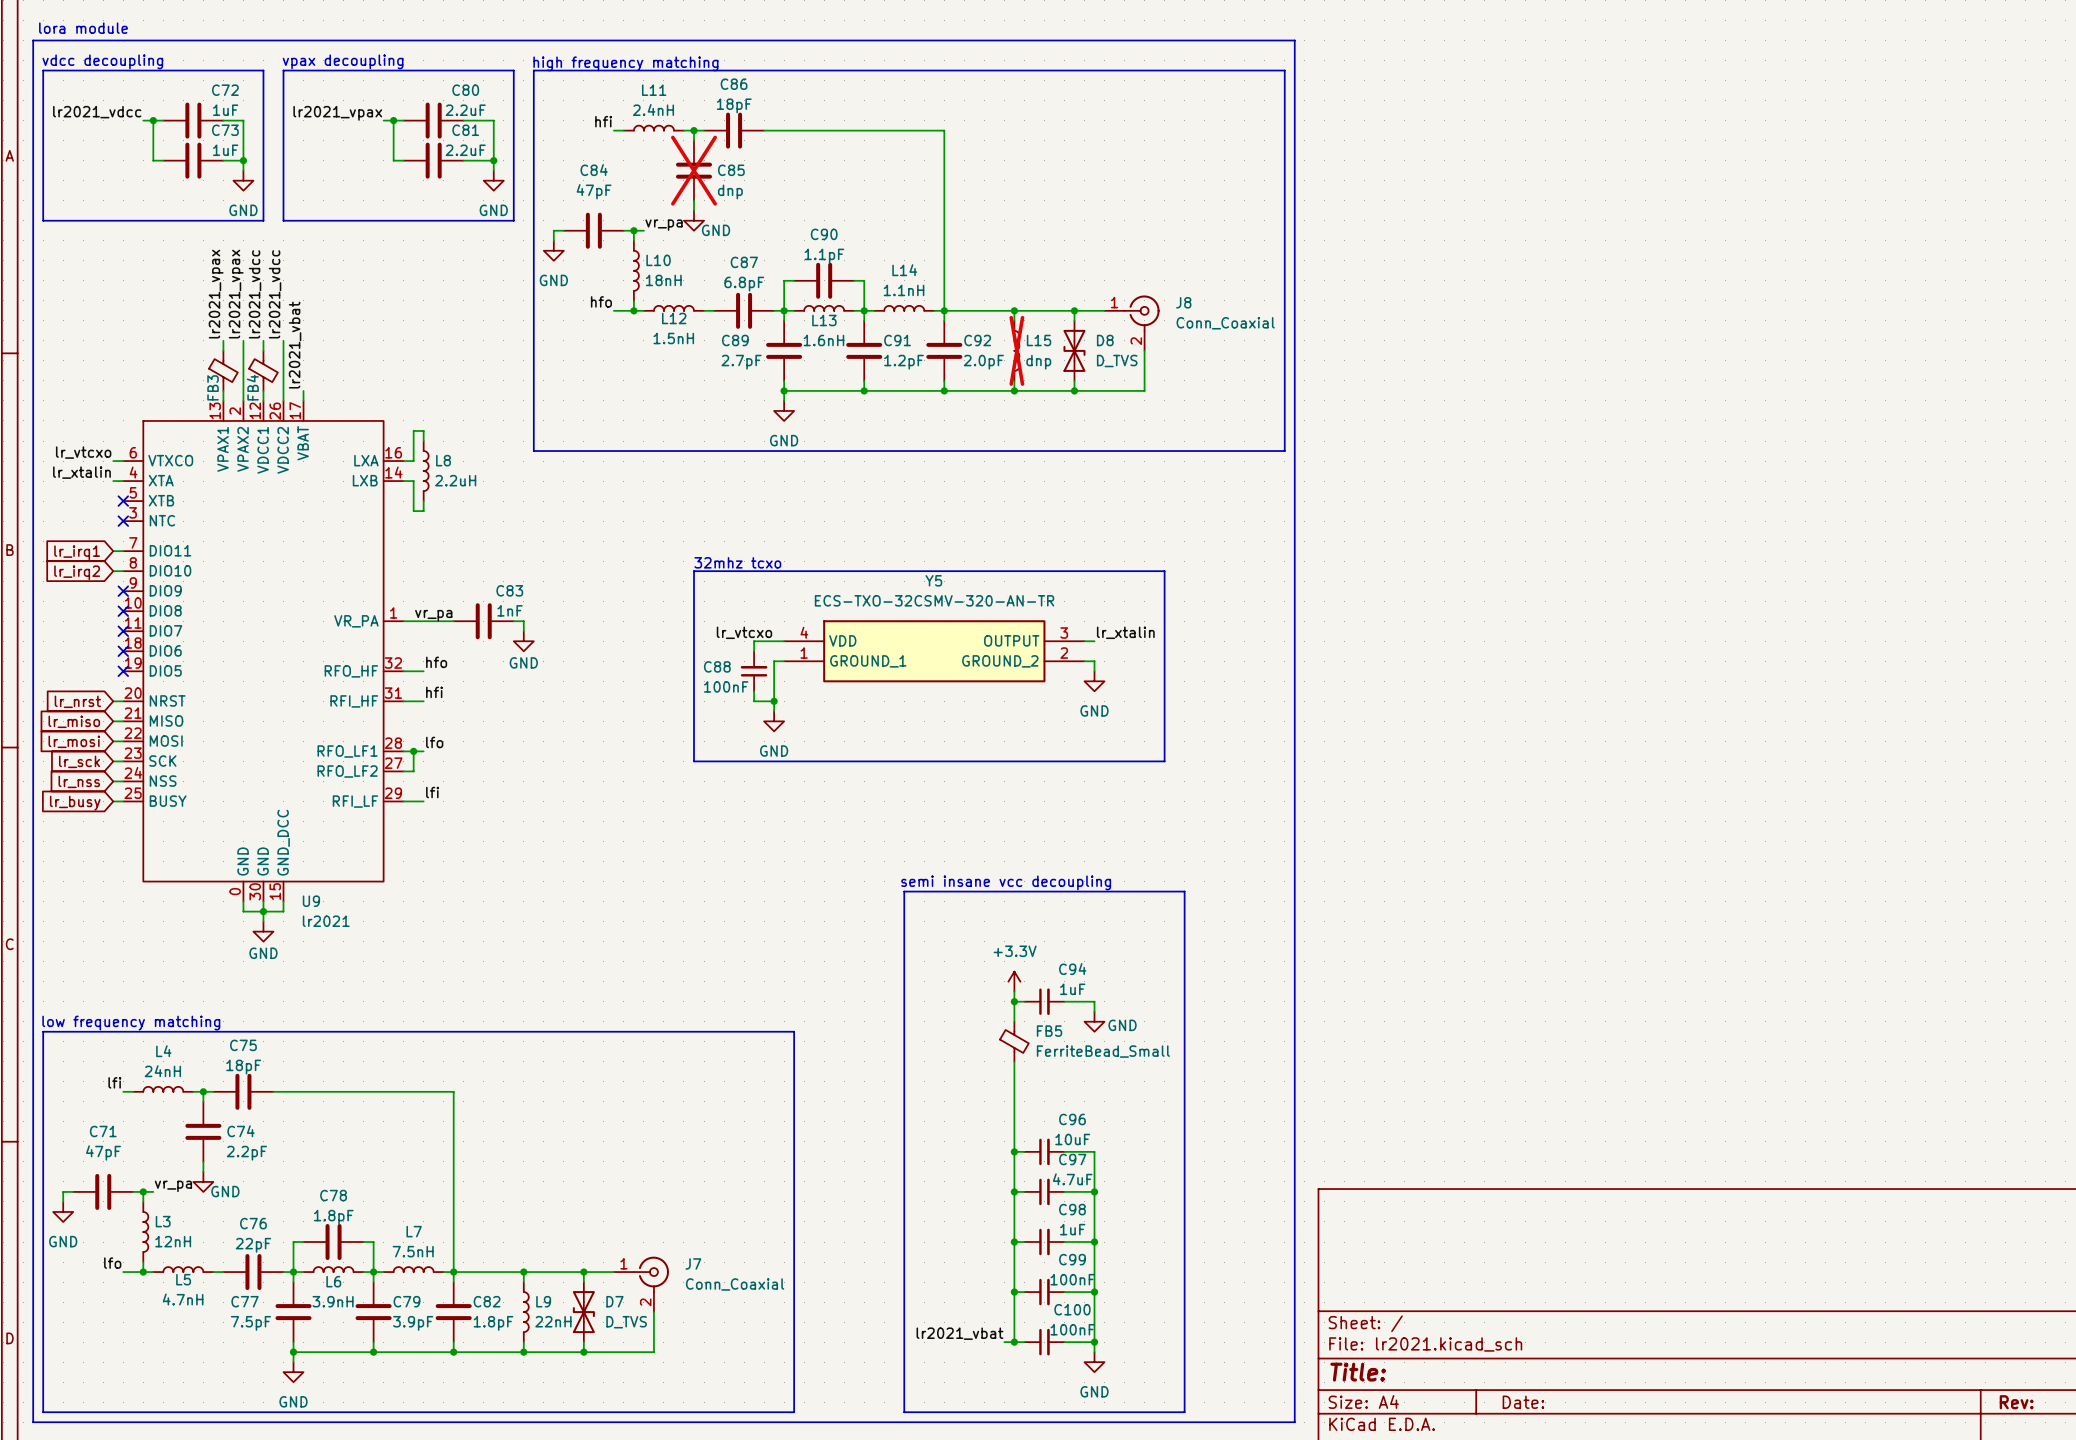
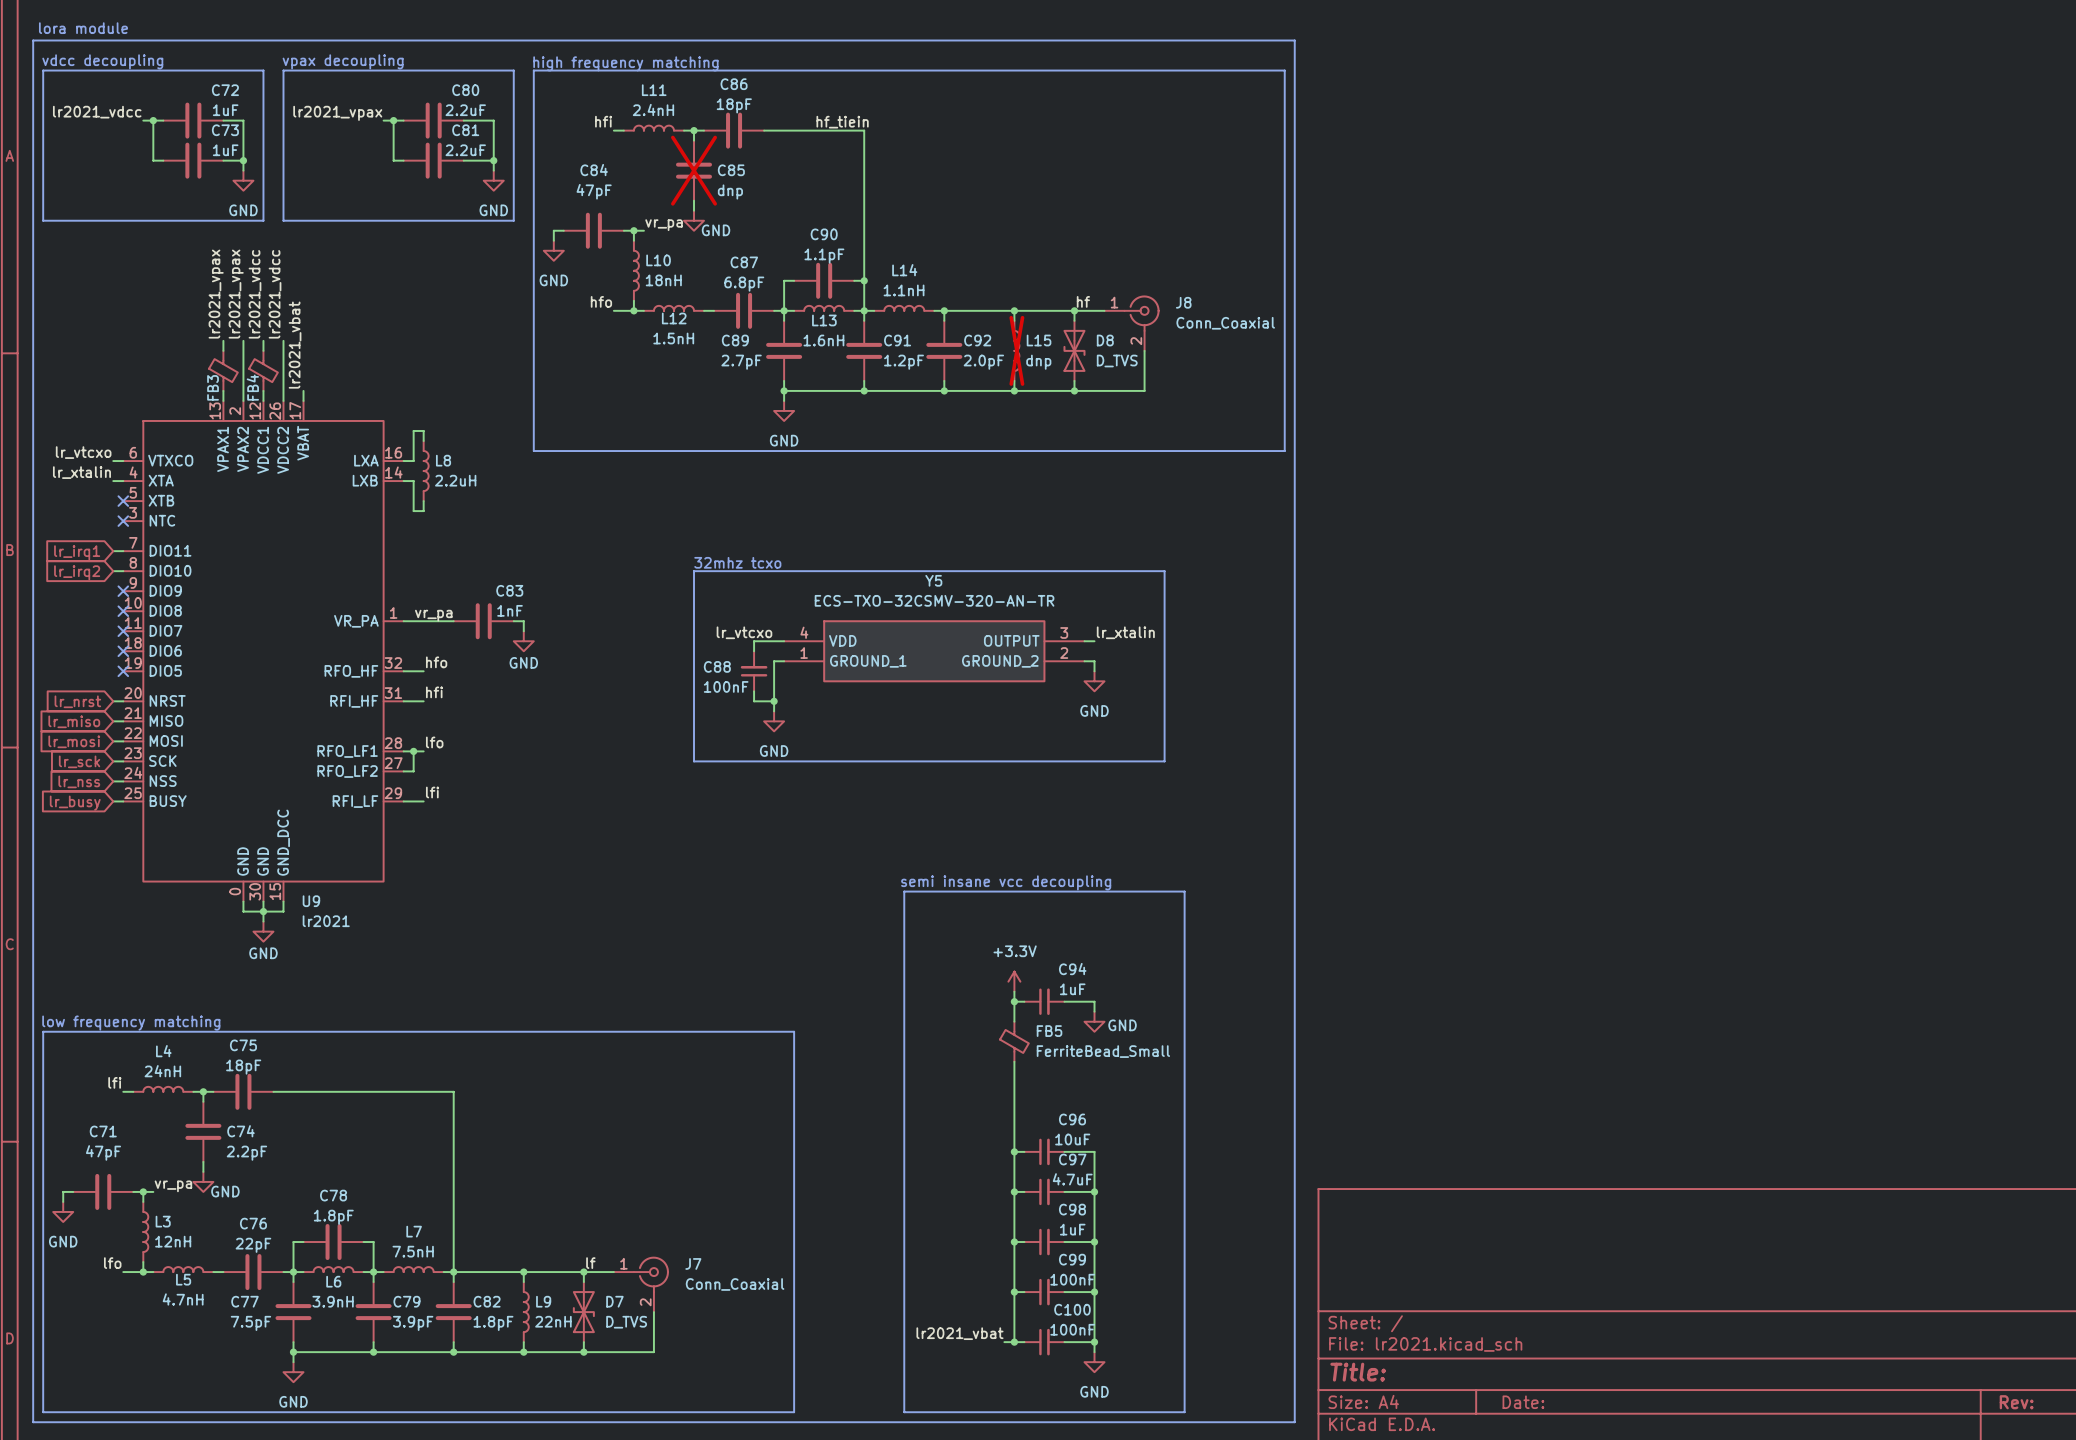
label: none -> hf_tiein (842, 122)
wire: (864, 130) (944, 130) (944, 310) -> (864, 130) (864, 280)
junction: none -> (864, 280)
label: none -> hf (1083, 301)
label: none -> lf (590, 1263)

